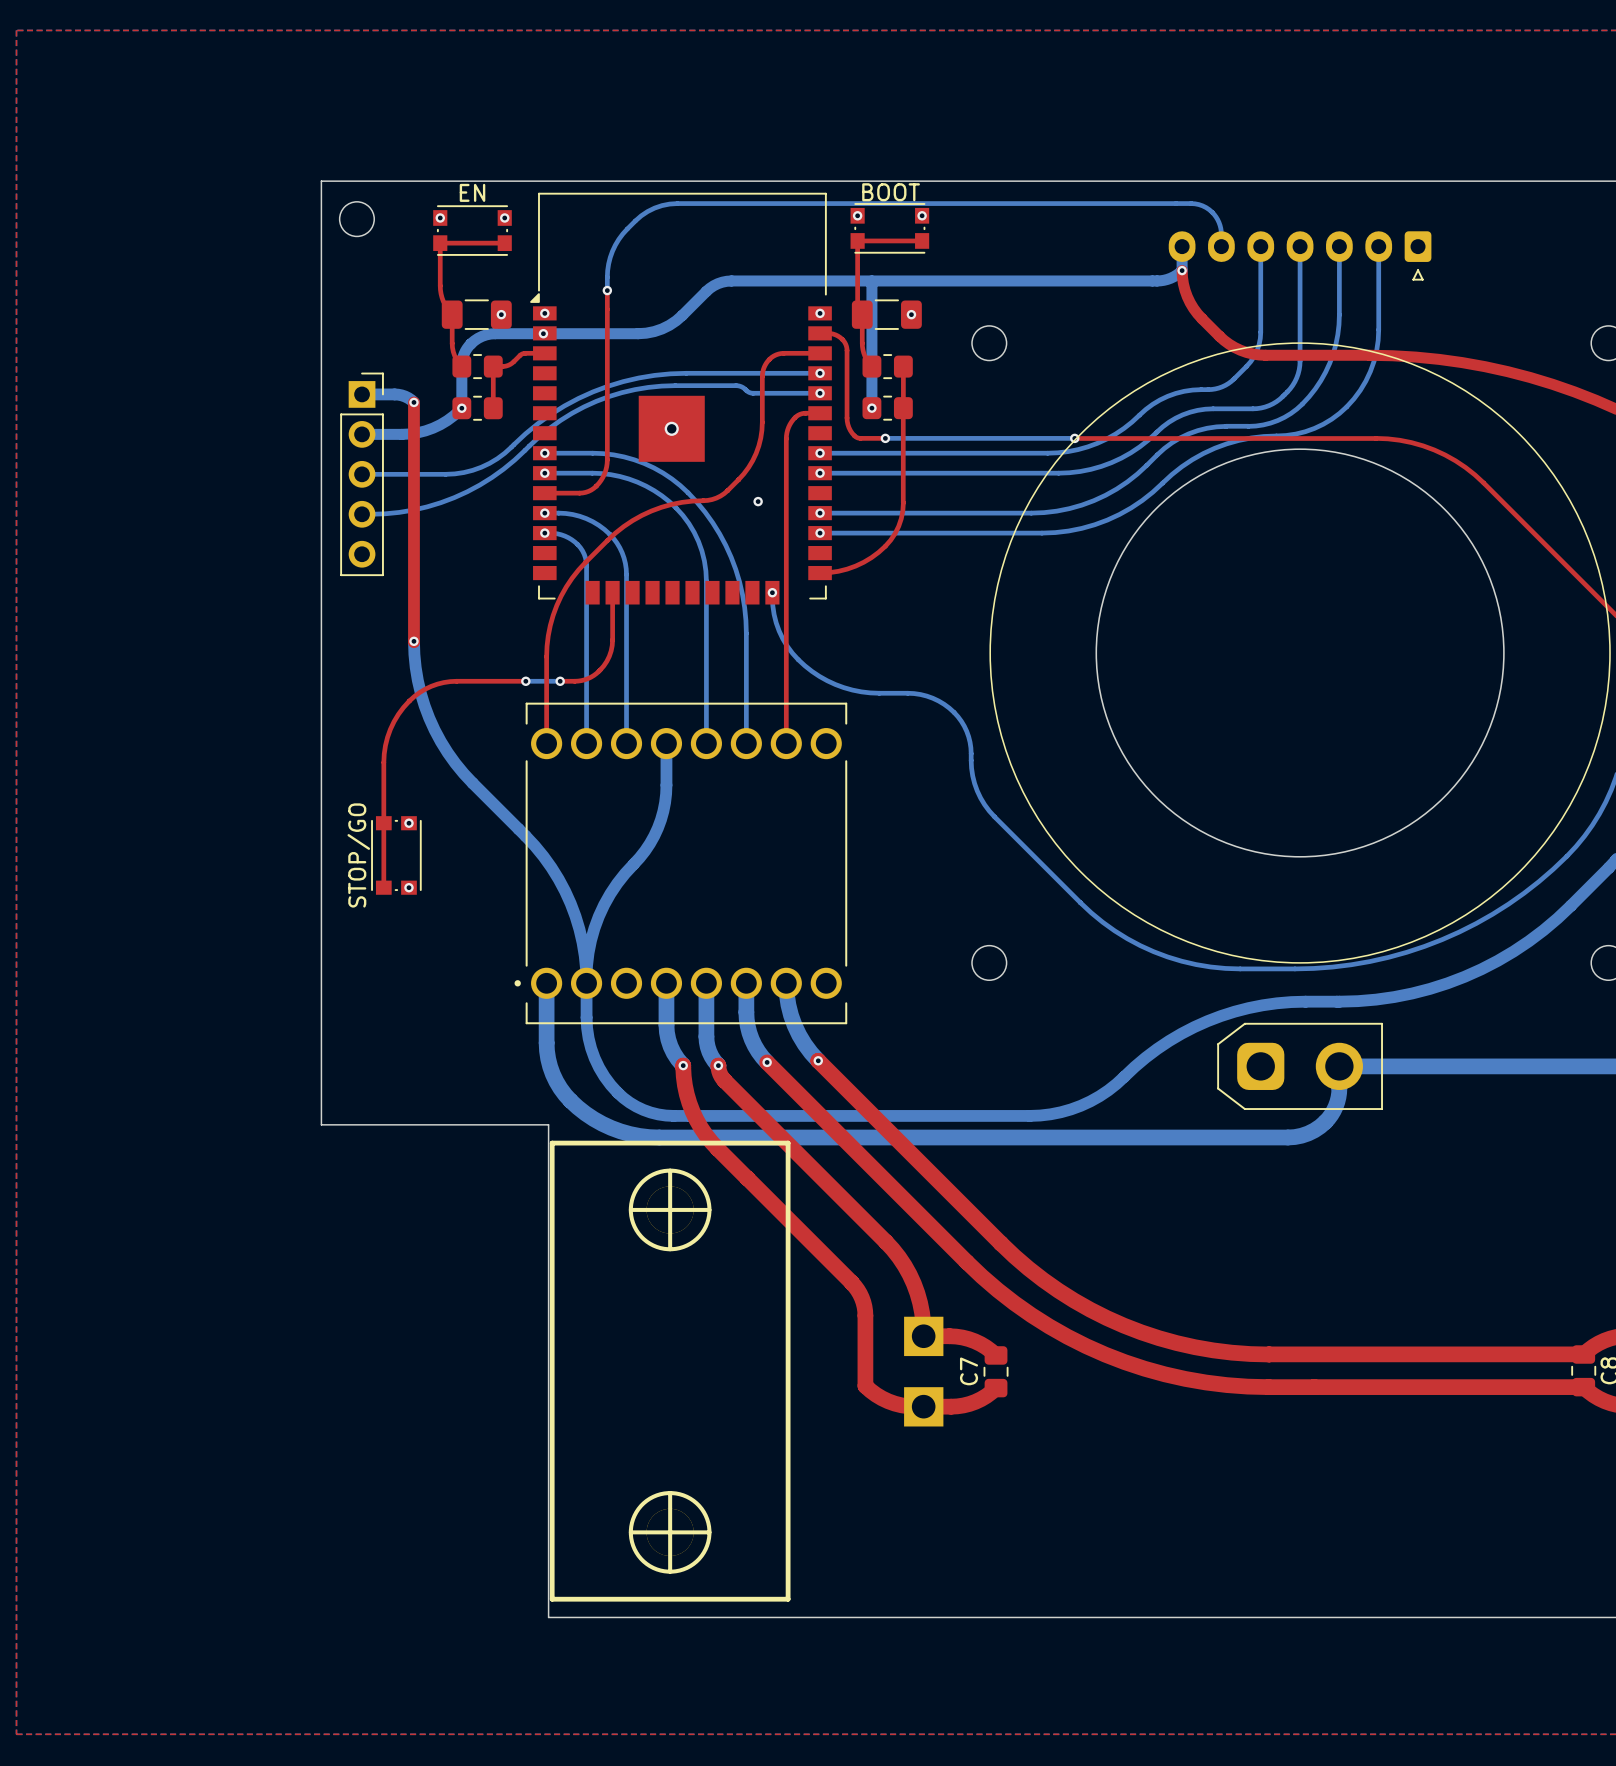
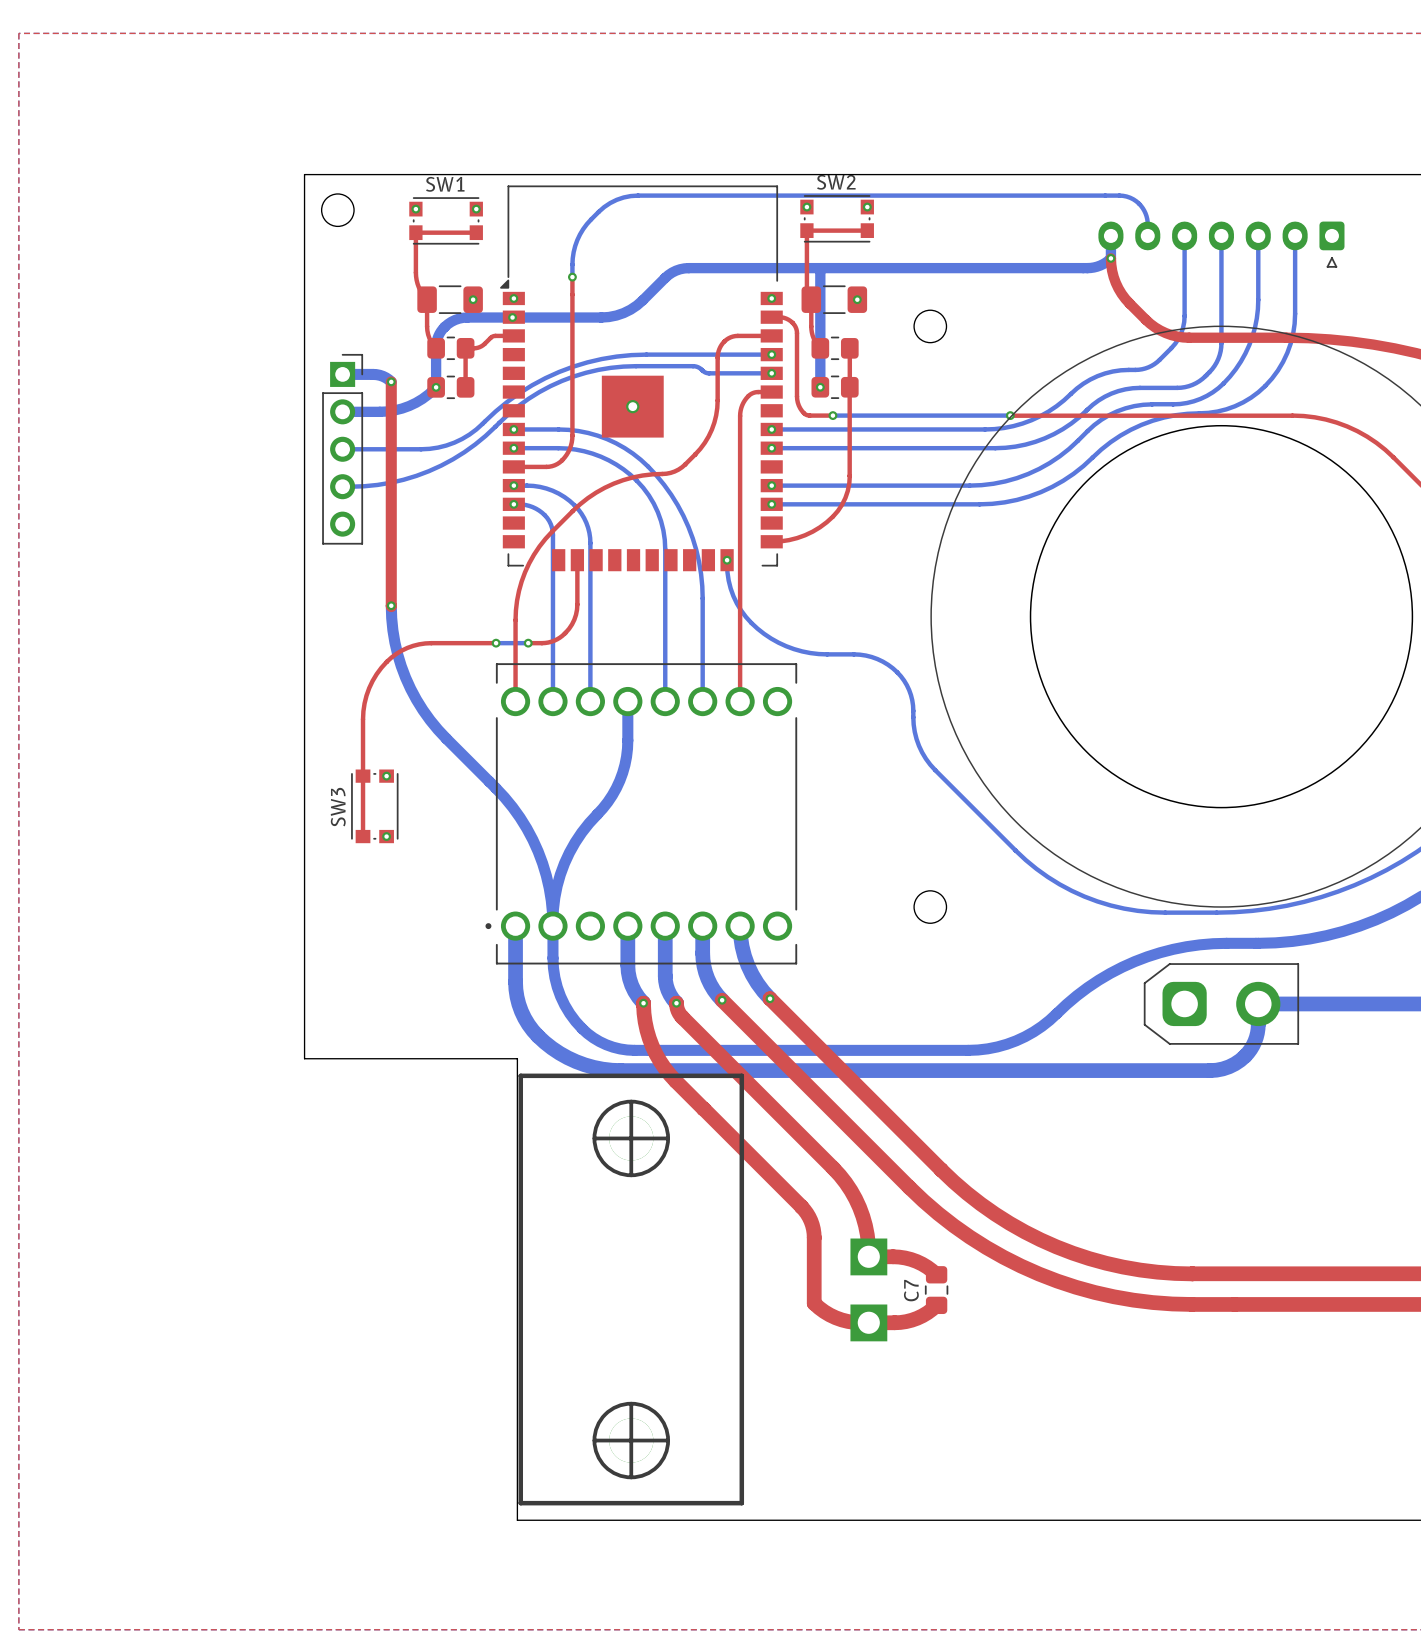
EN name: EN (472, 192) -> SW1 (445, 184)
BOOT name: BOOT (891, 192) -> SW2 (836, 182)
via: (758, 501) -> none
STOP/GO name: STOP/GO (358, 855) -> SW3 (338, 807)

